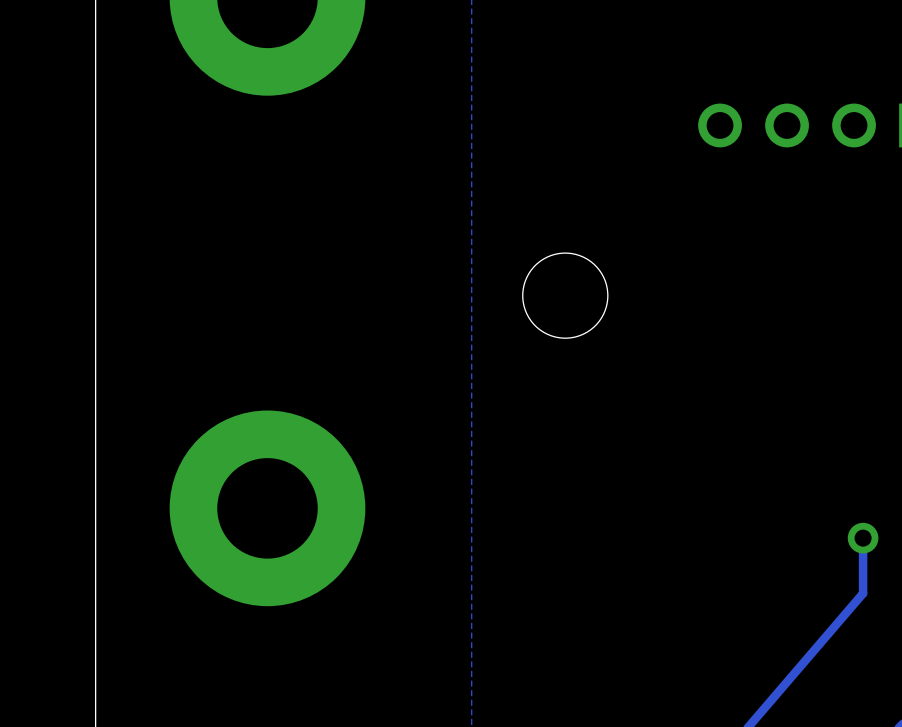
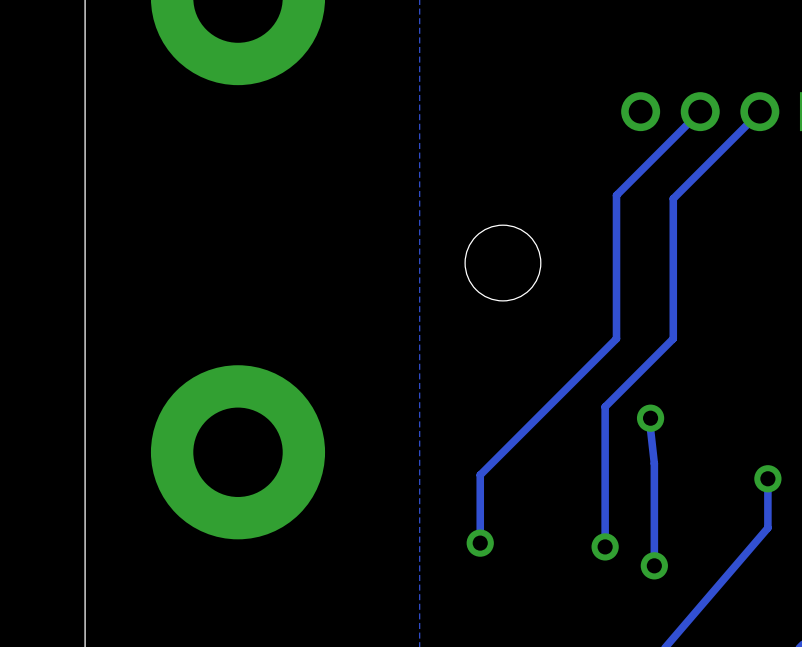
track: none -> (700, 111) (616, 195) (616, 338) (480, 474) (480, 543)
track: none -> (759, 112) (673, 198) (673, 338) (605, 406) (605, 546)
track: none -> (650, 418) (654, 463) (654, 565)
via: none -> (650, 418)
via: none -> (480, 543)
via: none -> (605, 546)
via: none -> (654, 565)

